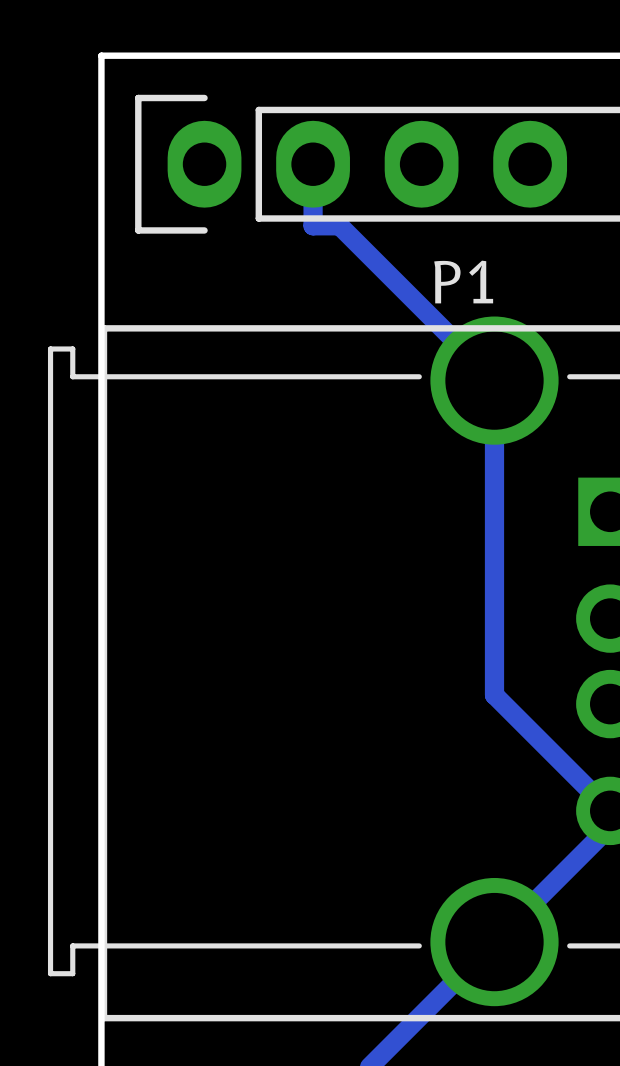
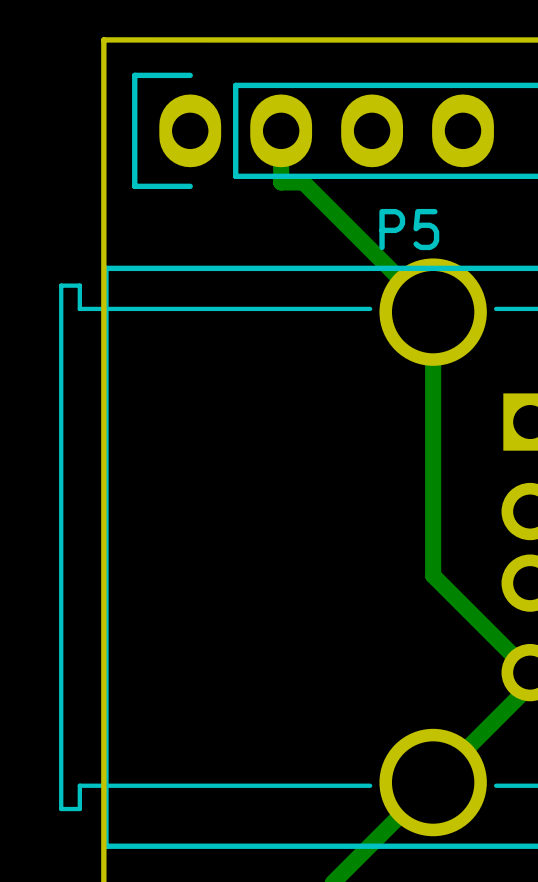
P1 name: P1 (463, 282) -> P5 (409, 229)

